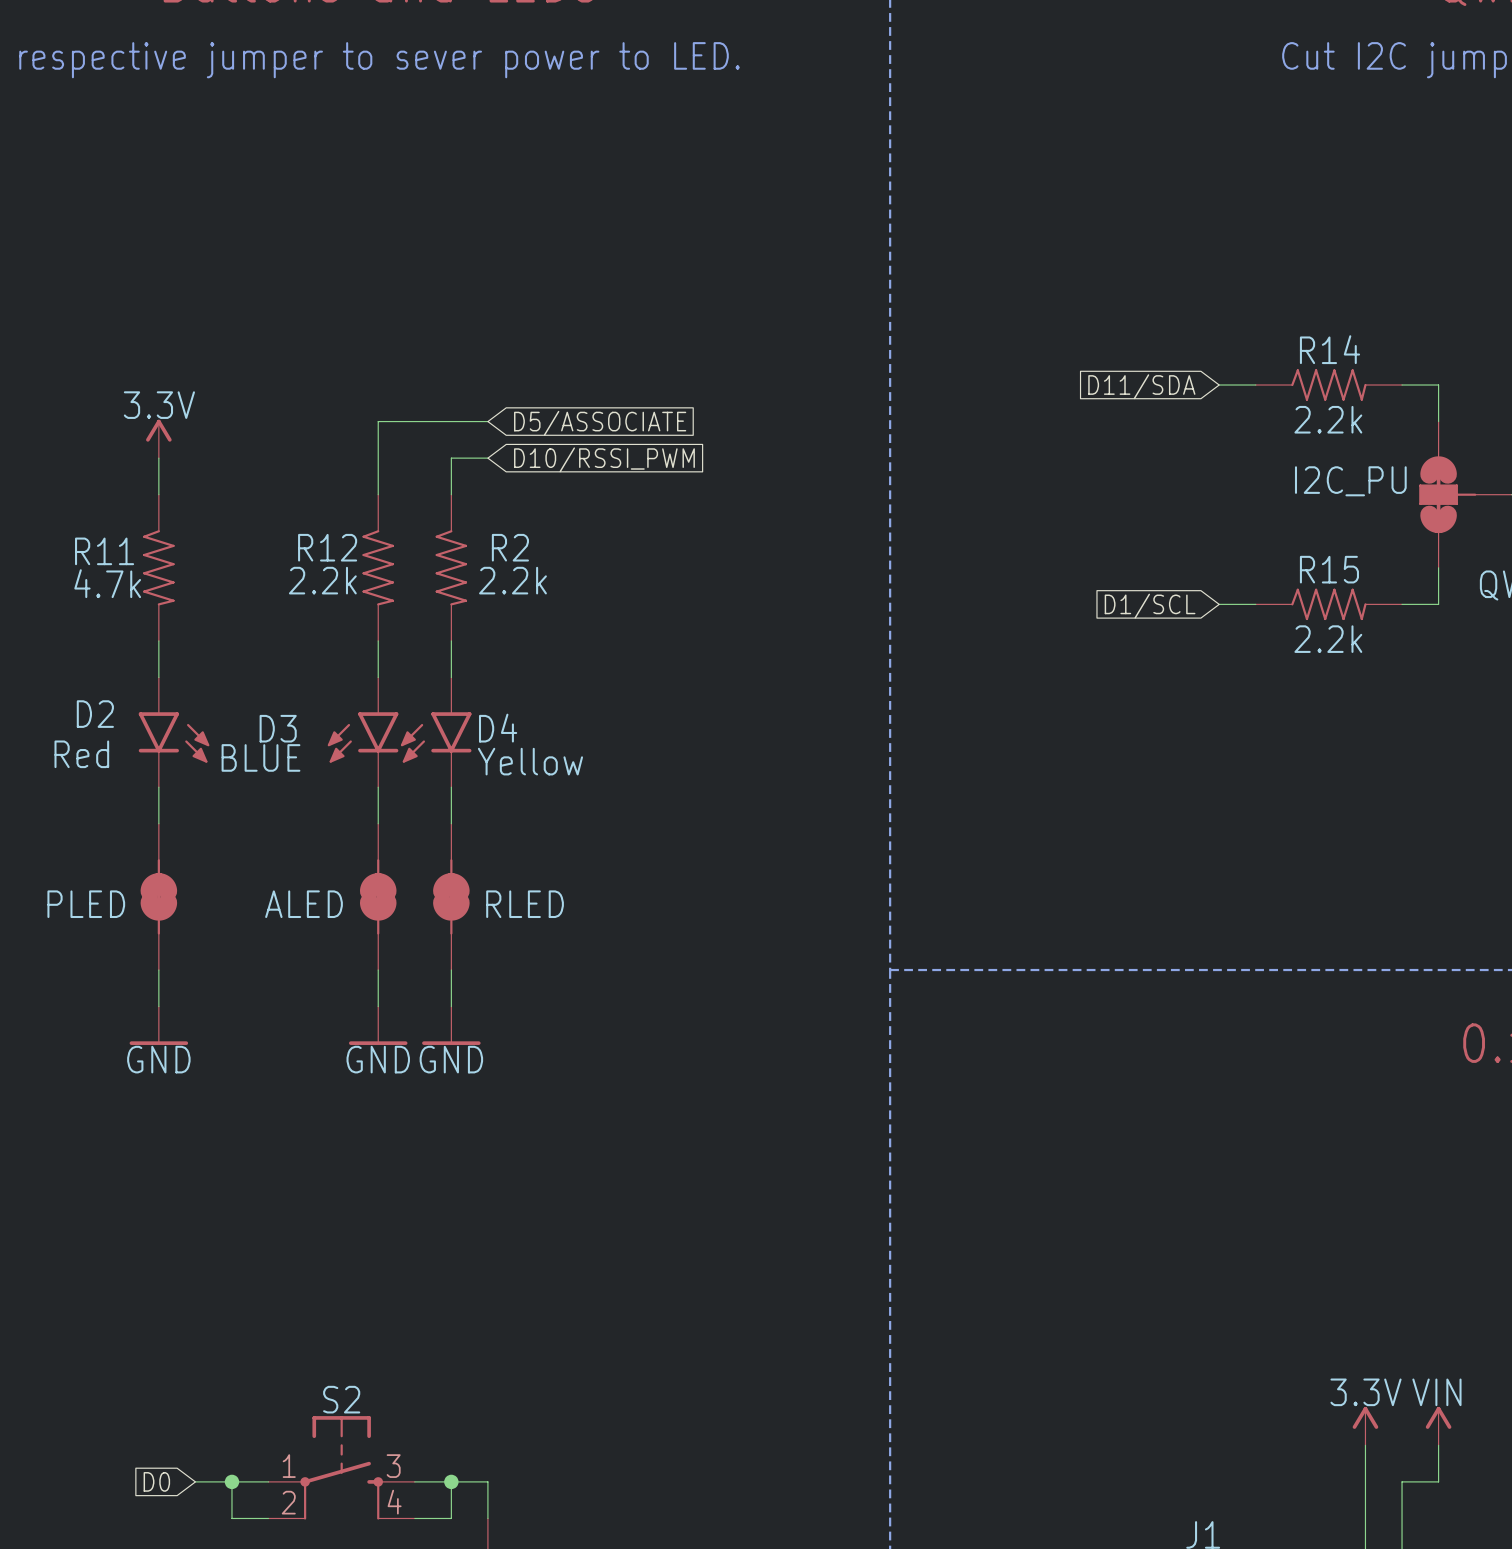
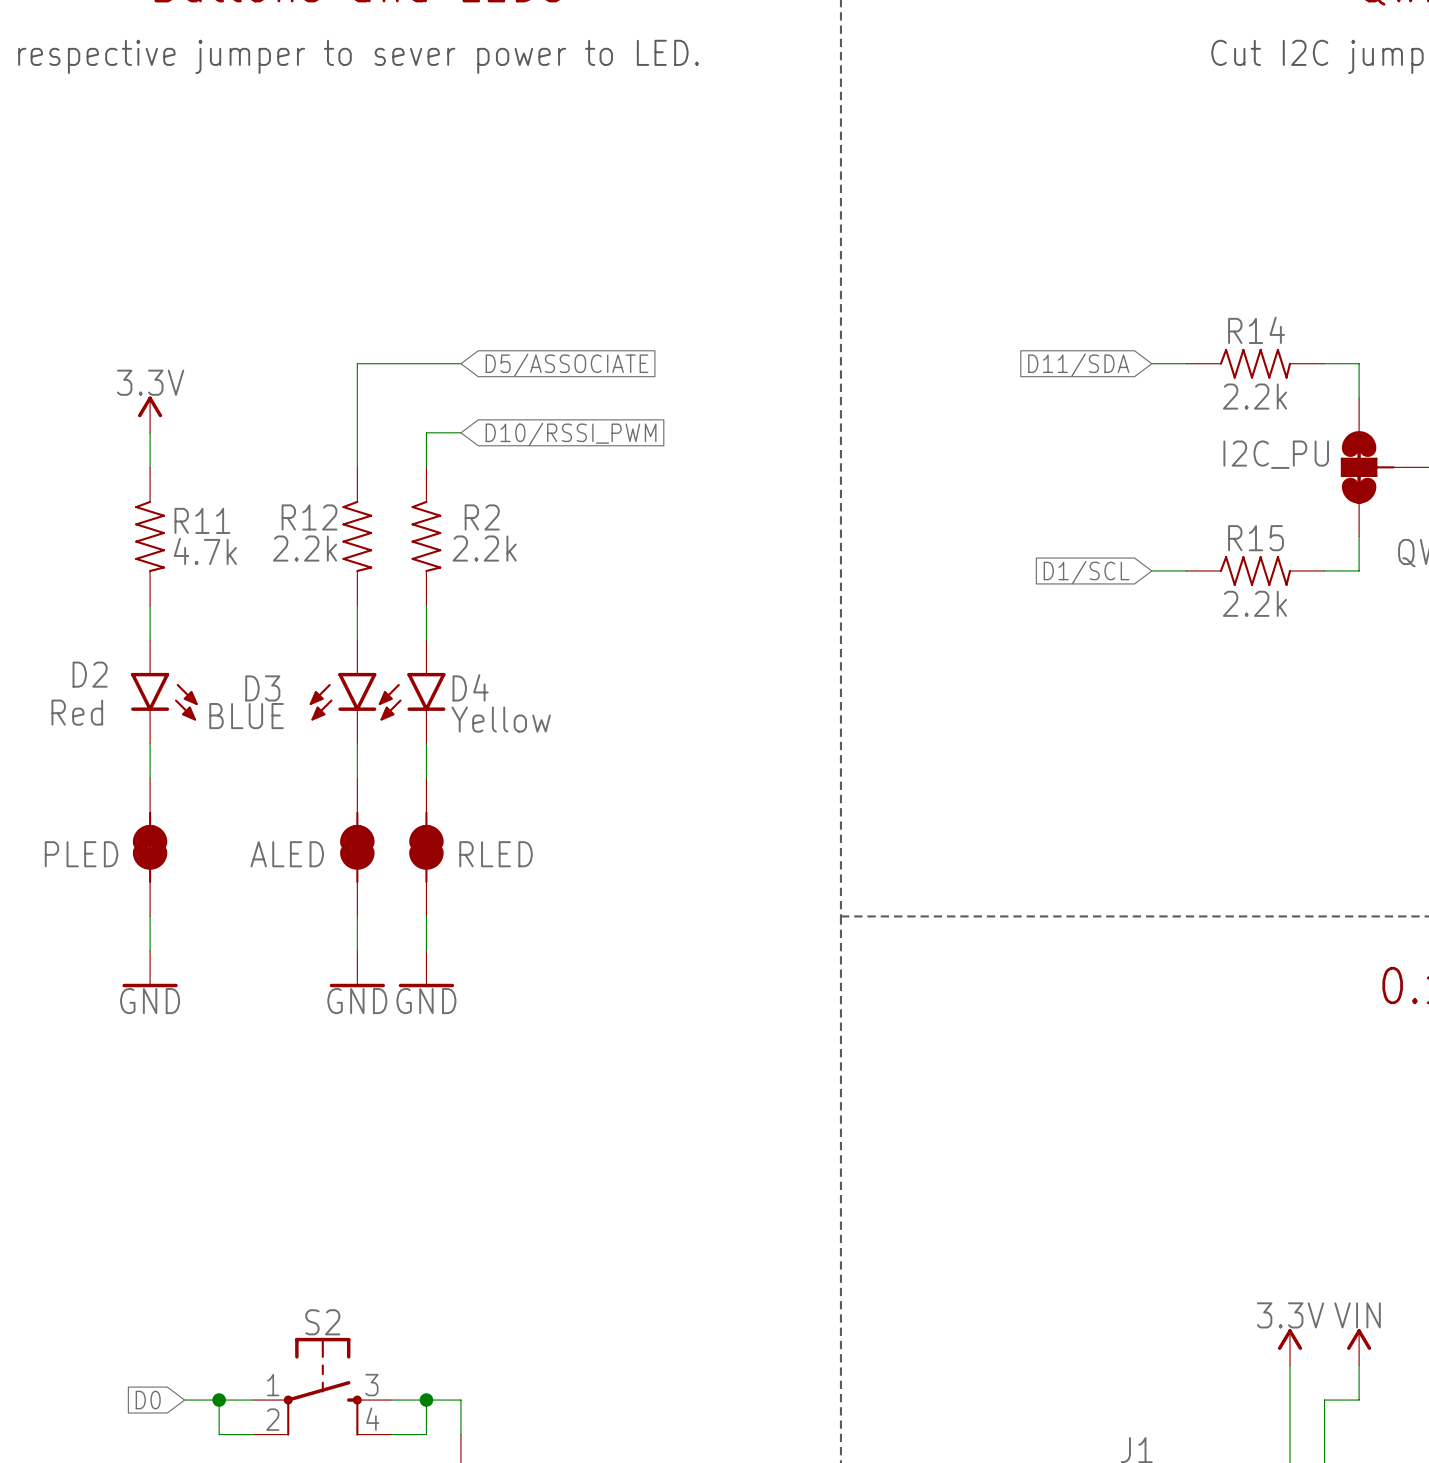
wire: (378, 421) (487, 421) -> (357, 398) (357, 363) (460, 363)
global label position: D5/ASSOCIATE (600, 423) -> D5/ASSOCIATE (566, 365)
R11 name position: R11 (104, 551) -> R11 (202, 520)
R11 value position: 4.7k (107, 583) -> 4.7k (205, 551)

